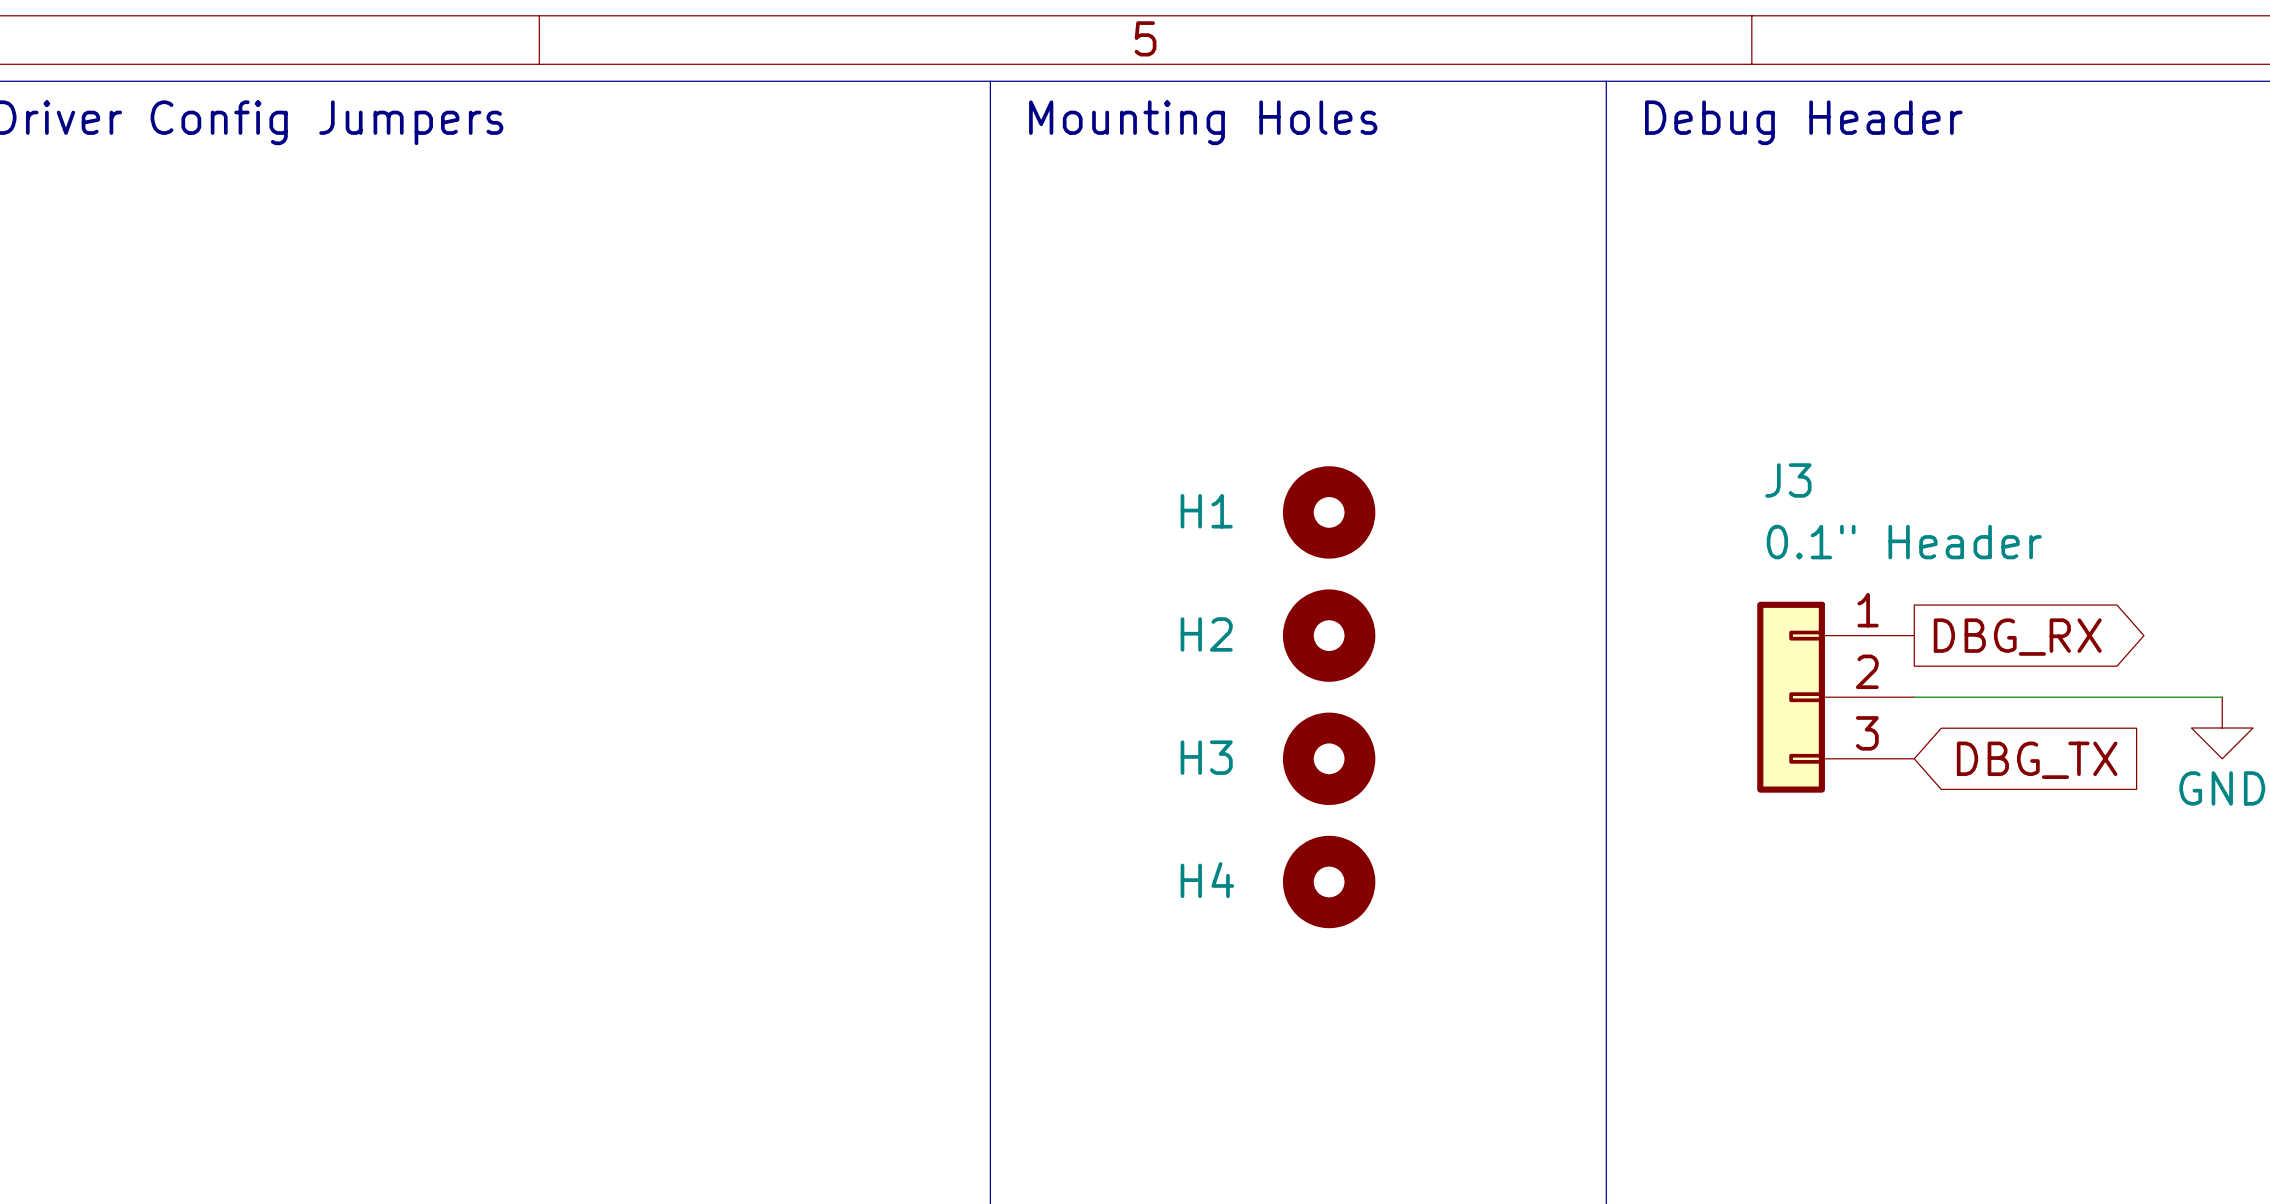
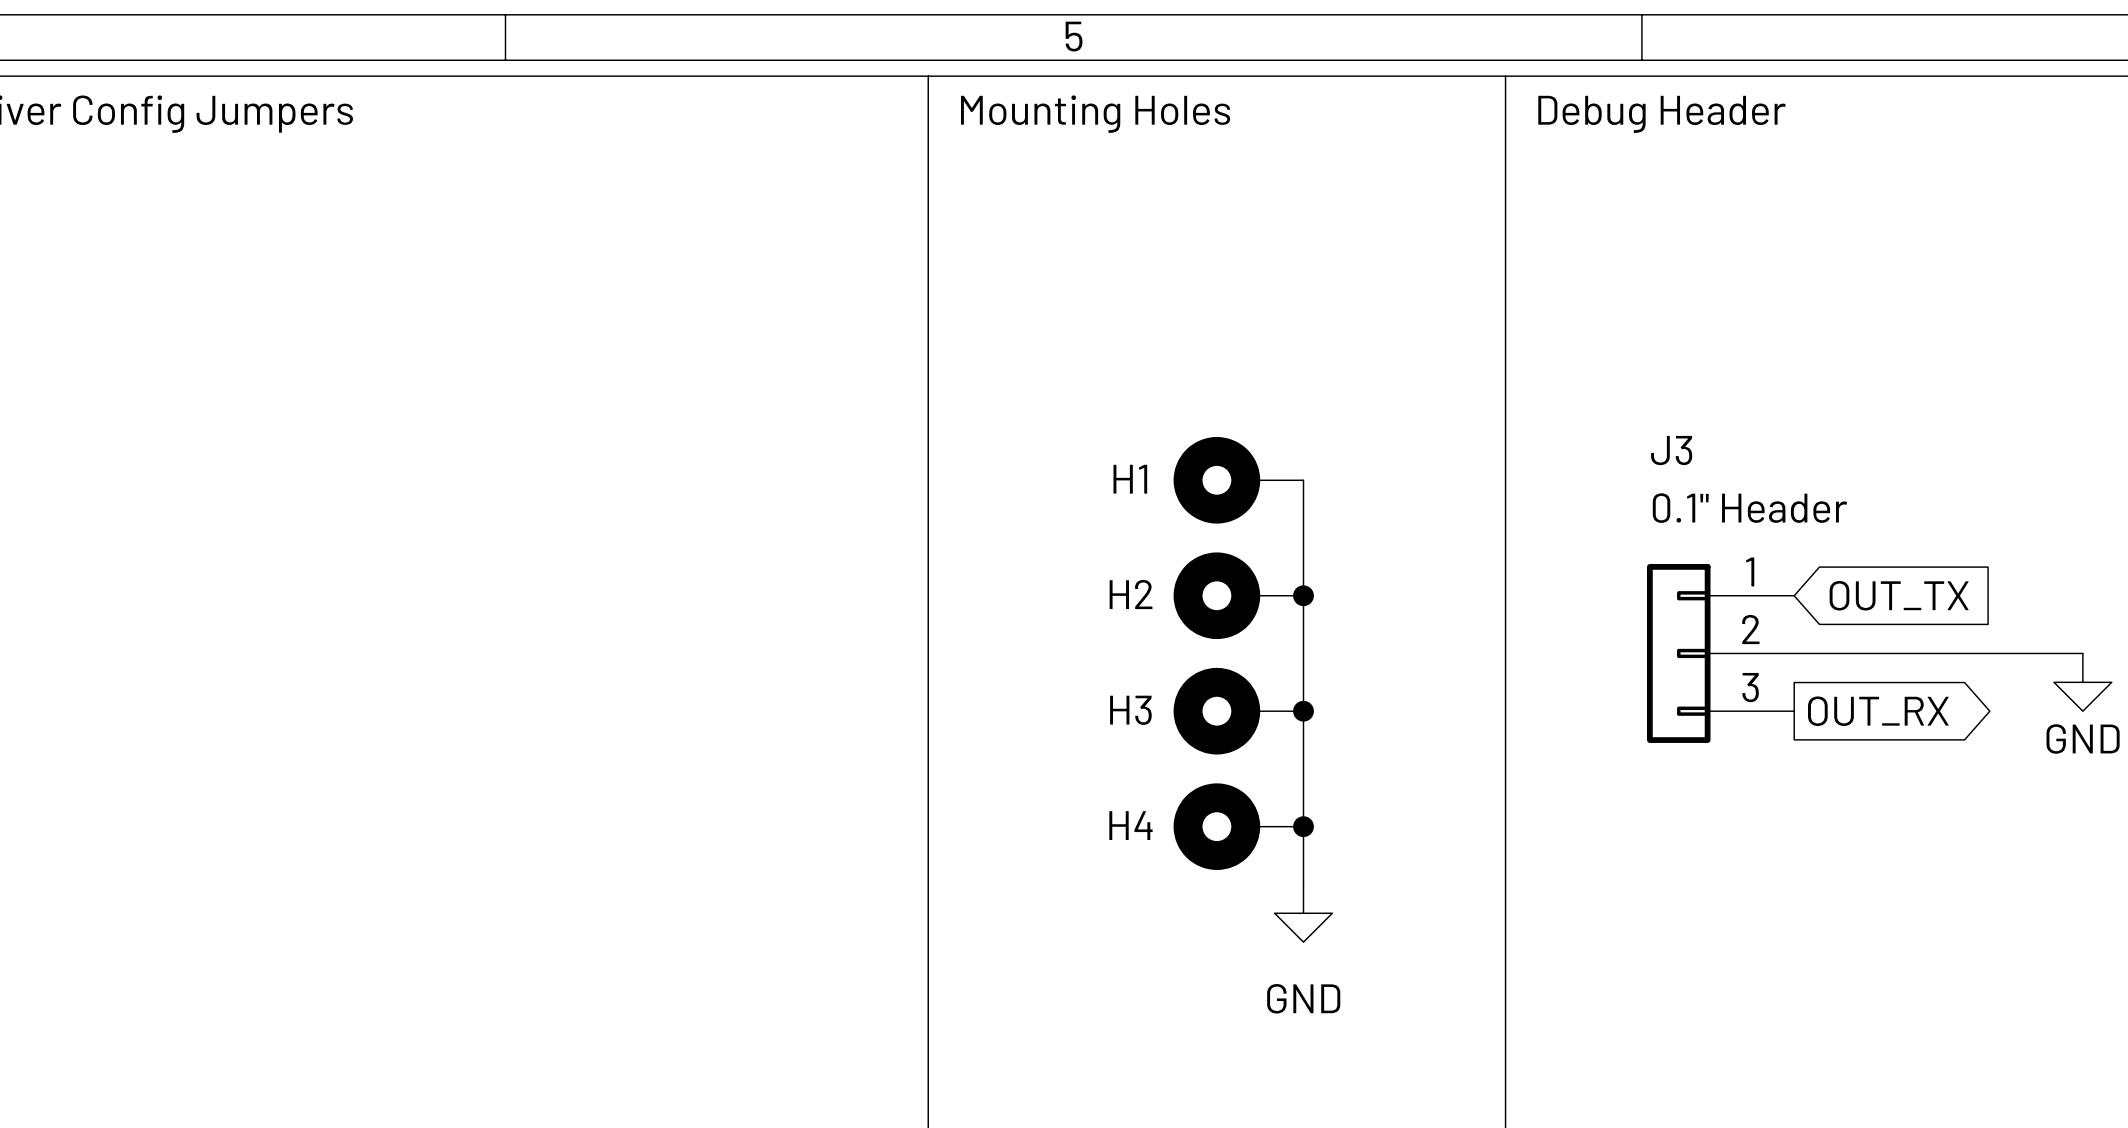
H1 symbol: [1282, 466, 1376, 559] -> [1173, 436, 1304, 524]
wire: none -> (1303, 480) (1303, 884)
H2 symbol: [1282, 589, 1376, 682] -> [1173, 552, 1304, 640]
junction: none -> (1303, 595)
global label shape: output (2017, 637) -> input (1899, 595)
global label: DBG_RX (2017, 637) -> OUT_TX (1899, 595)
H3 symbol: [1282, 712, 1376, 805] -> [1173, 667, 1304, 755]
junction: none -> (1303, 711)
global label shape: input (2037, 760) -> output (1878, 711)
global label: DBG_TX (2037, 760) -> OUT_RX (1878, 711)
H4 symbol: [1282, 835, 1376, 929] -> [1173, 783, 1304, 870]
junction: none -> (1303, 826)
power symbol: none -> GND (1303, 913)

